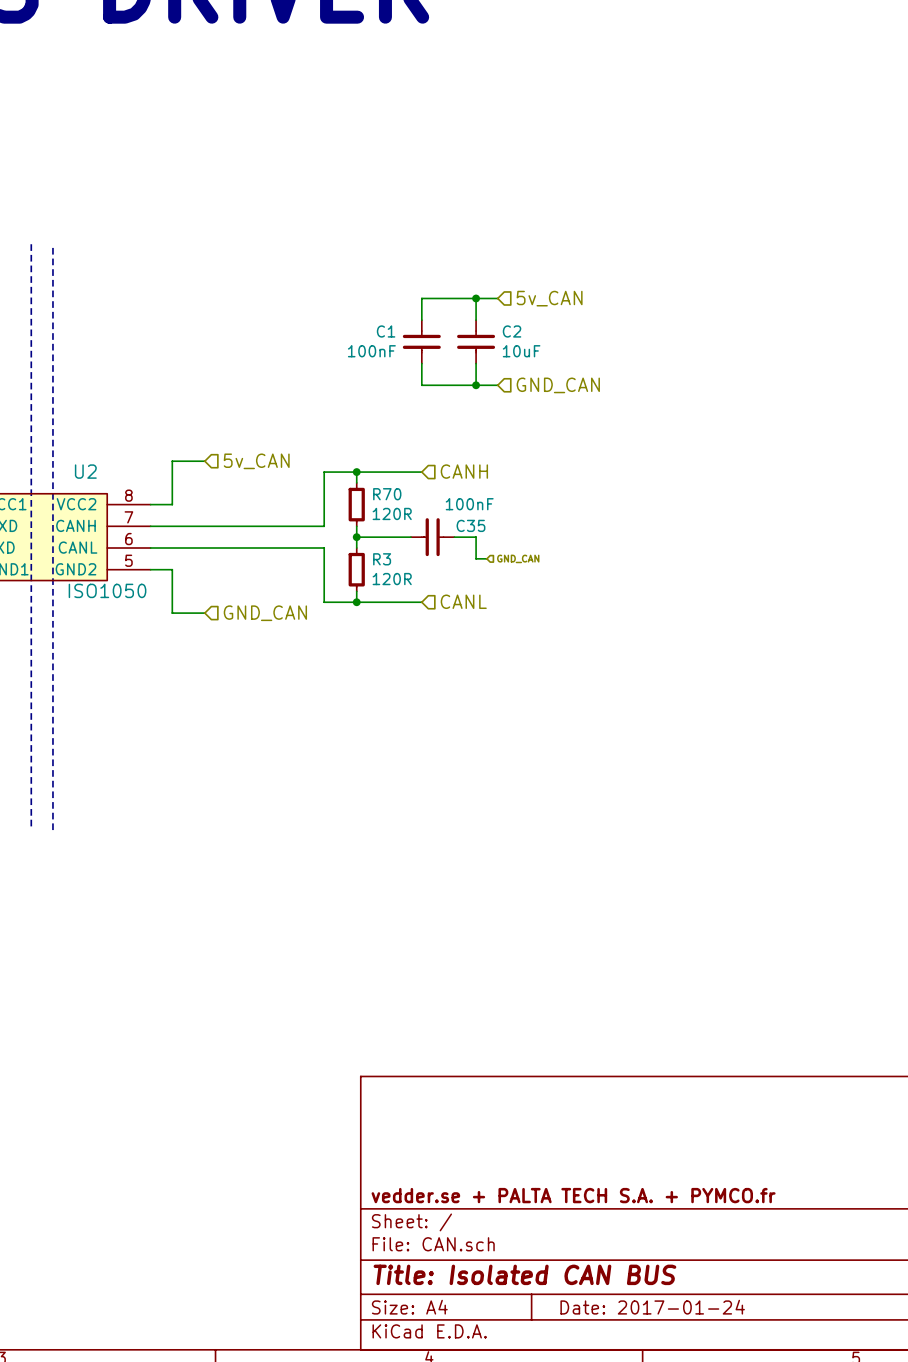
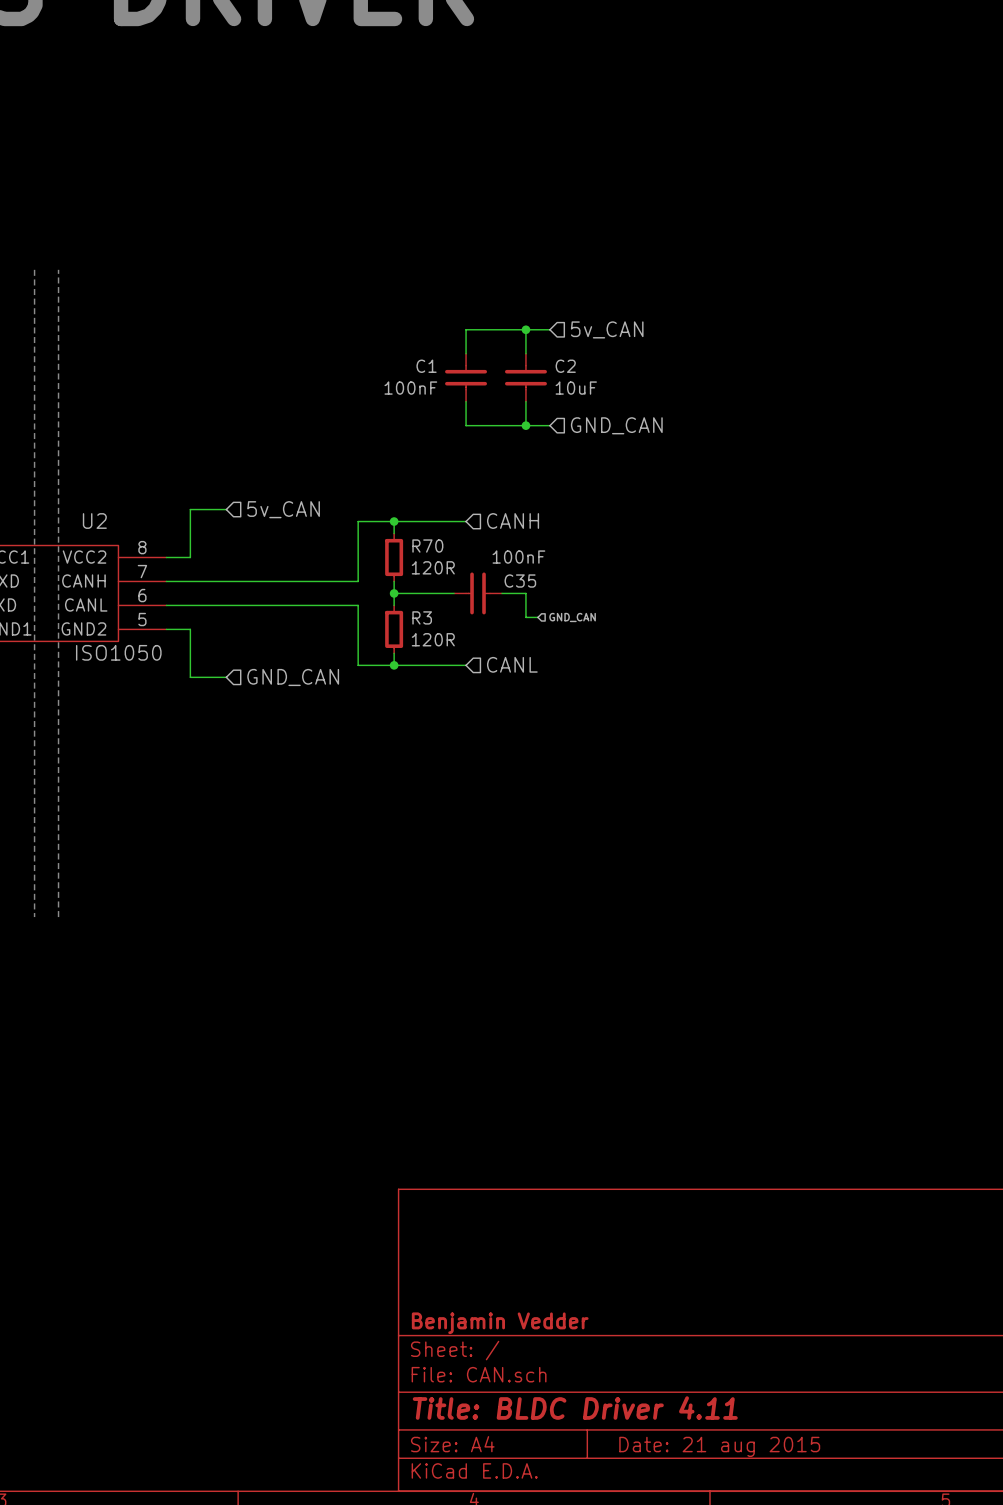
title block: vedder.se + PALTA TECH S.A. + PYMCO.fr (573, 1195) -> Benjamin Vedder (500, 1323)
title block: Title: Isolated CAN BUS (524, 1274) -> Title: BLDC Driver 4.11 (575, 1408)
title block: Date: 2017-01-24 (652, 1307) -> Date: 21 aug 2015 (719, 1446)

